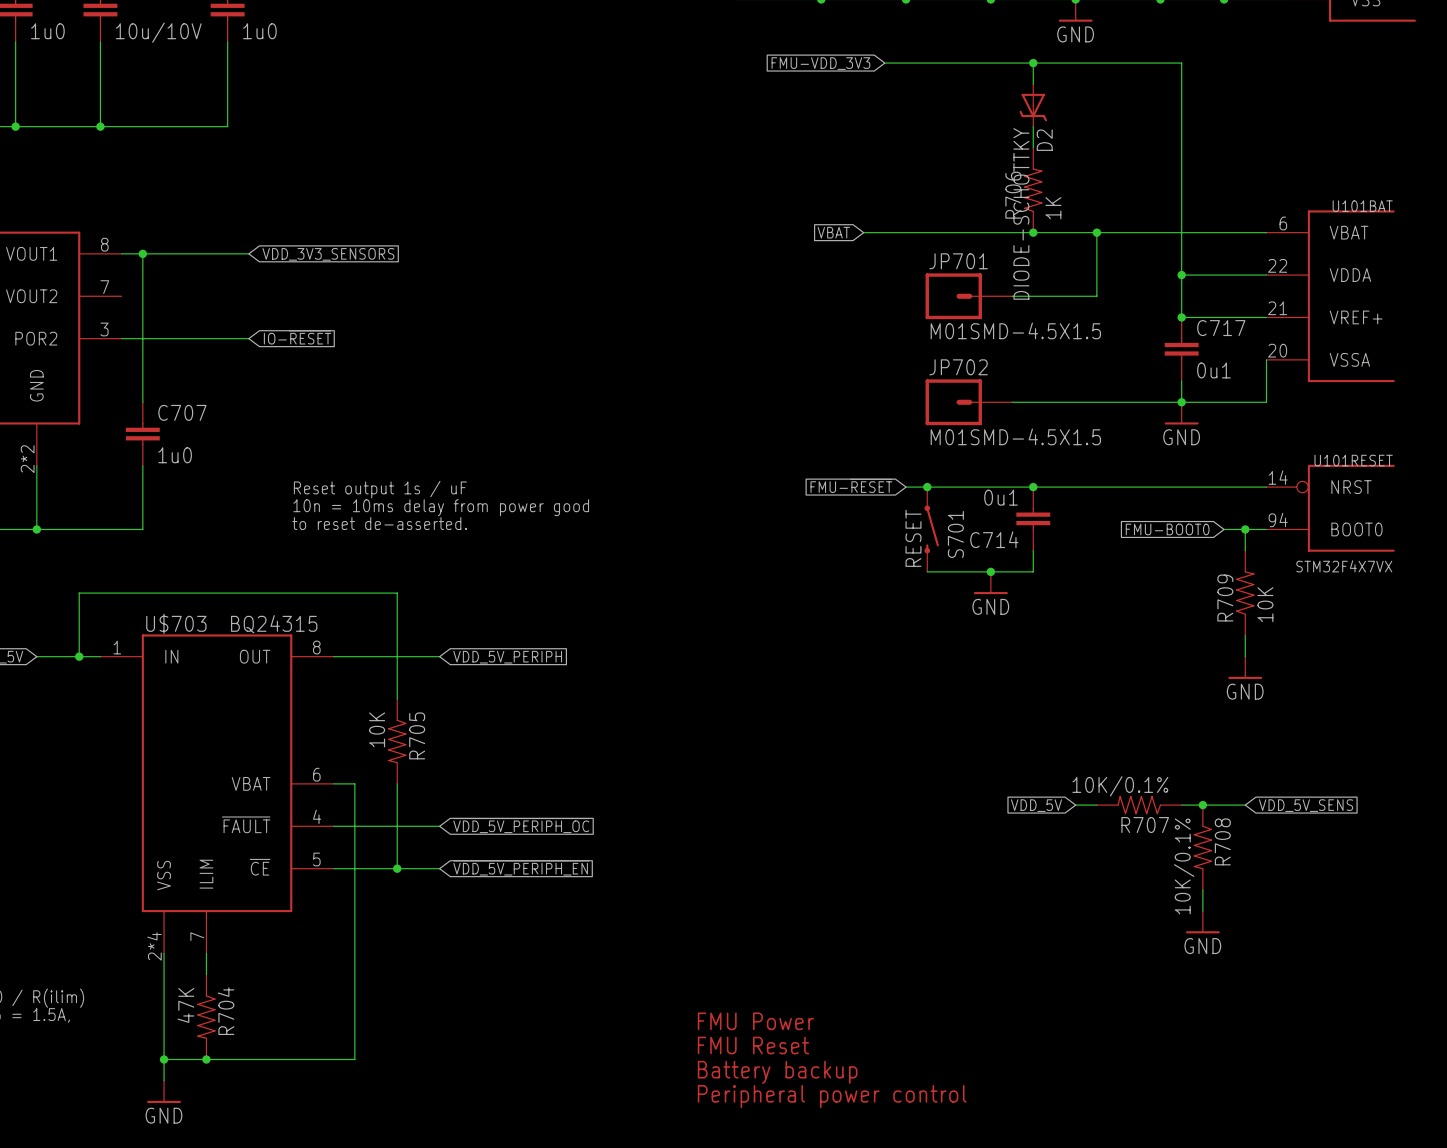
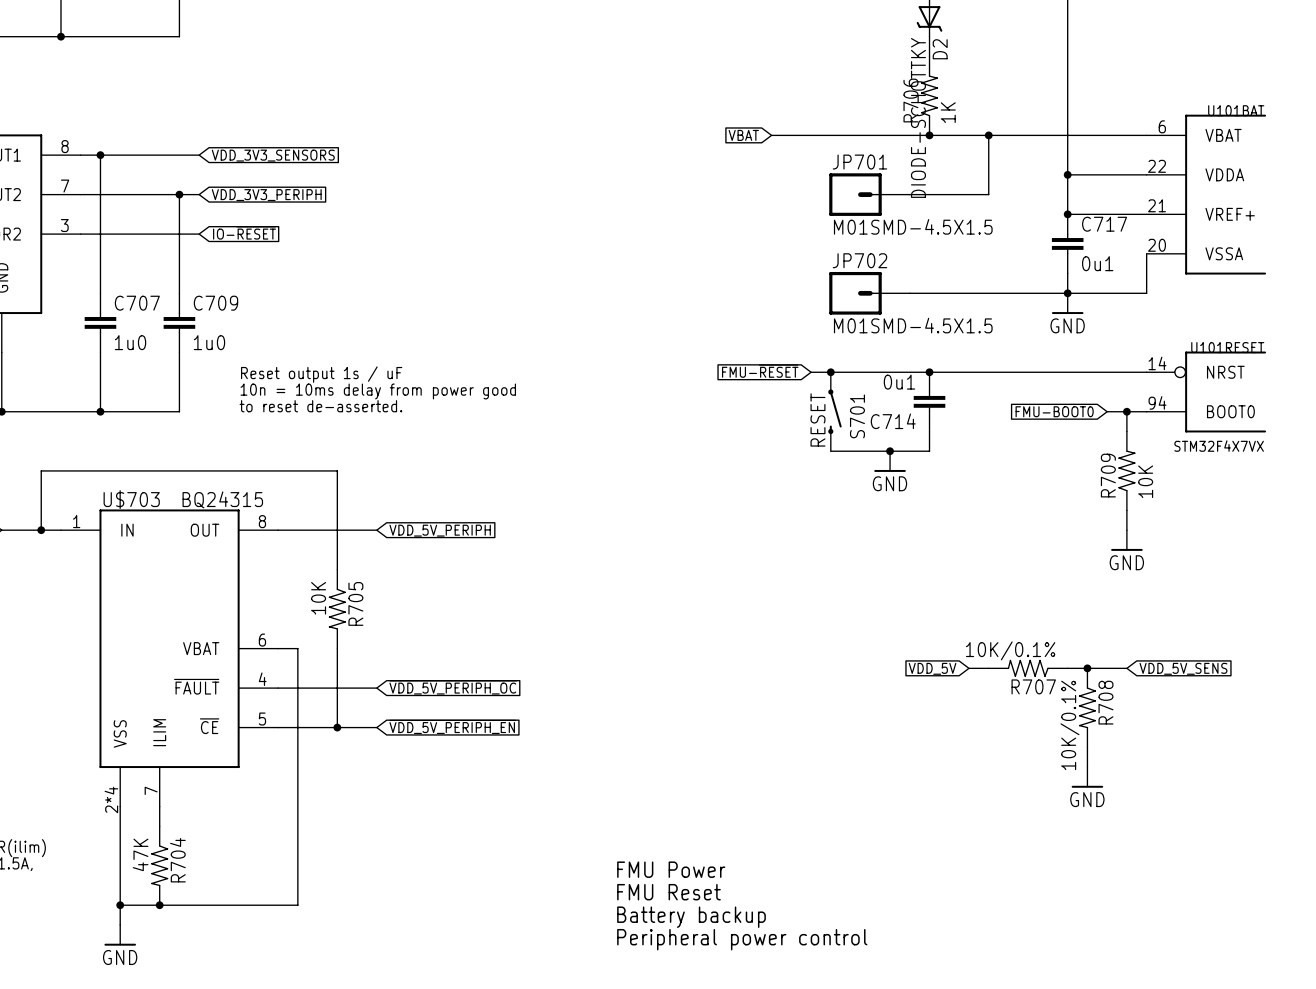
wire: none -> (80, 194) (199, 194)
wire: none -> (179, 194) (179, 293)
junction: none -> (179, 194)
global label: none -> VDD_3V3_PERIPH (266, 195)
C709: none -> 1u0 (179, 322)
wire: none -> (179, 352) (179, 411) (100, 411)
junction: none -> (100, 411)

